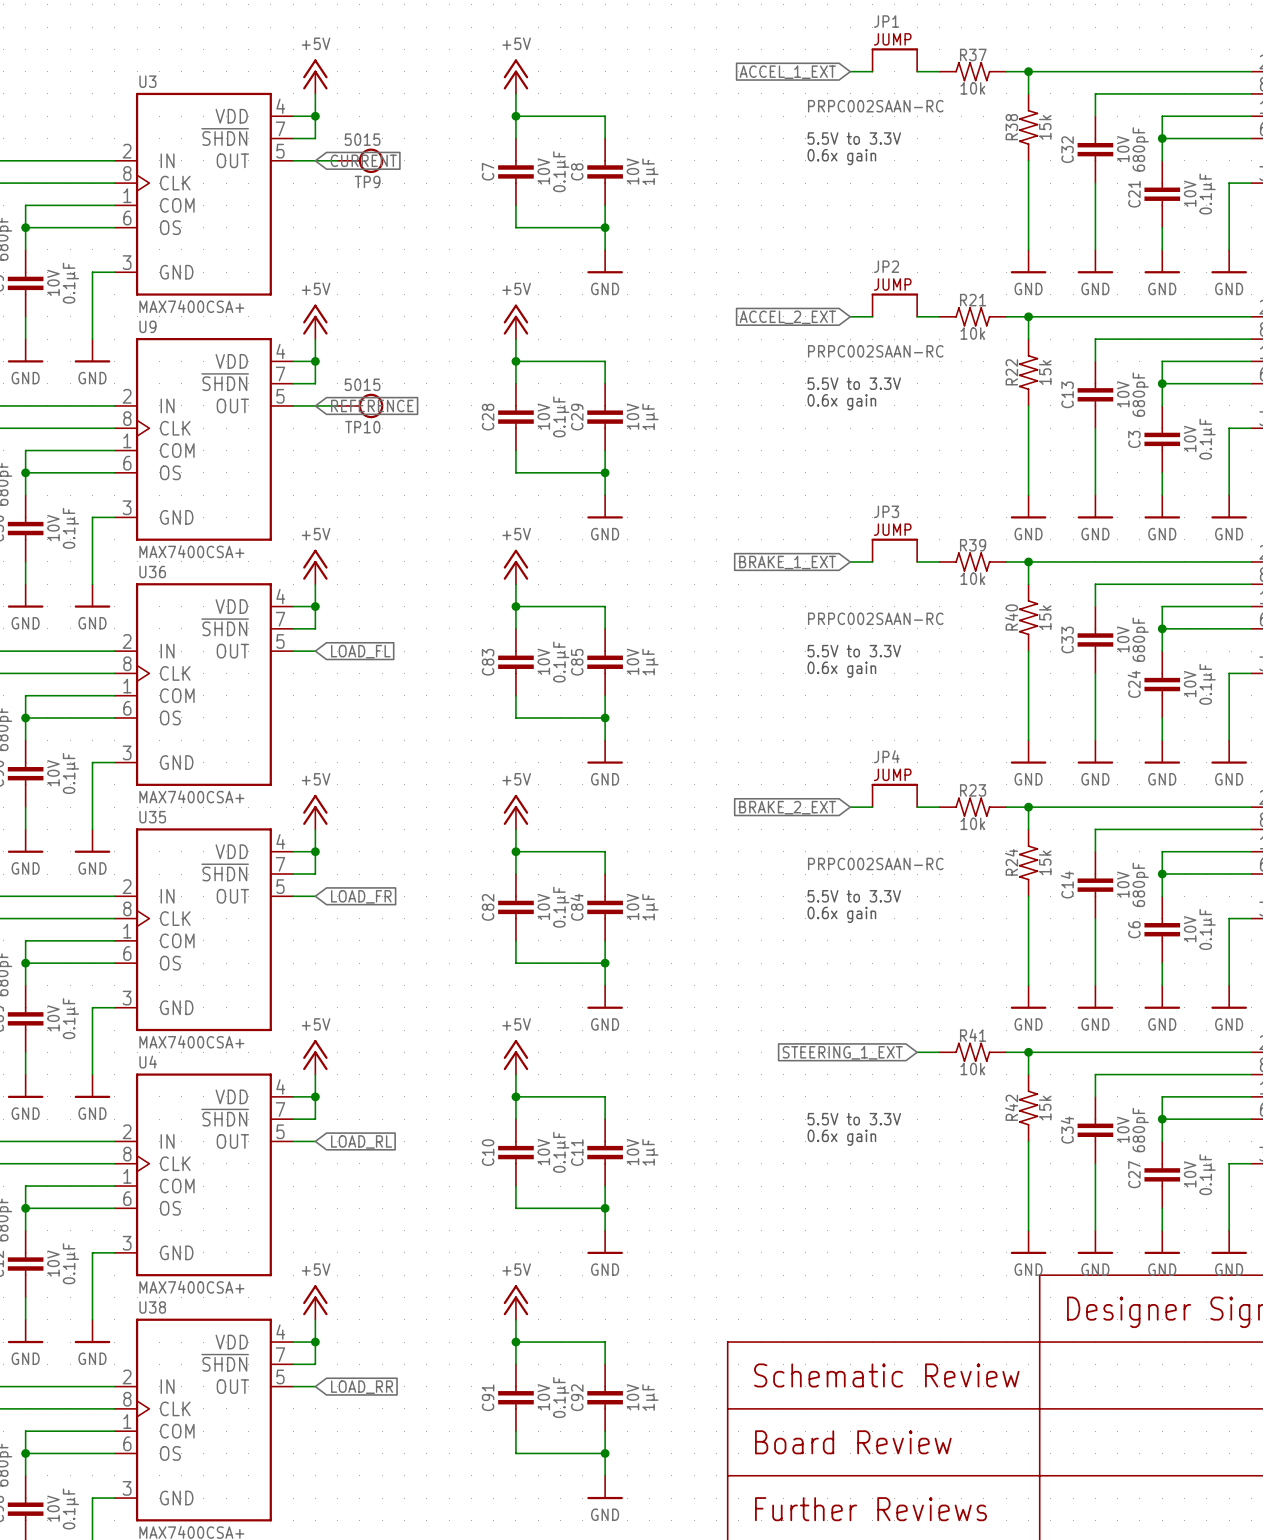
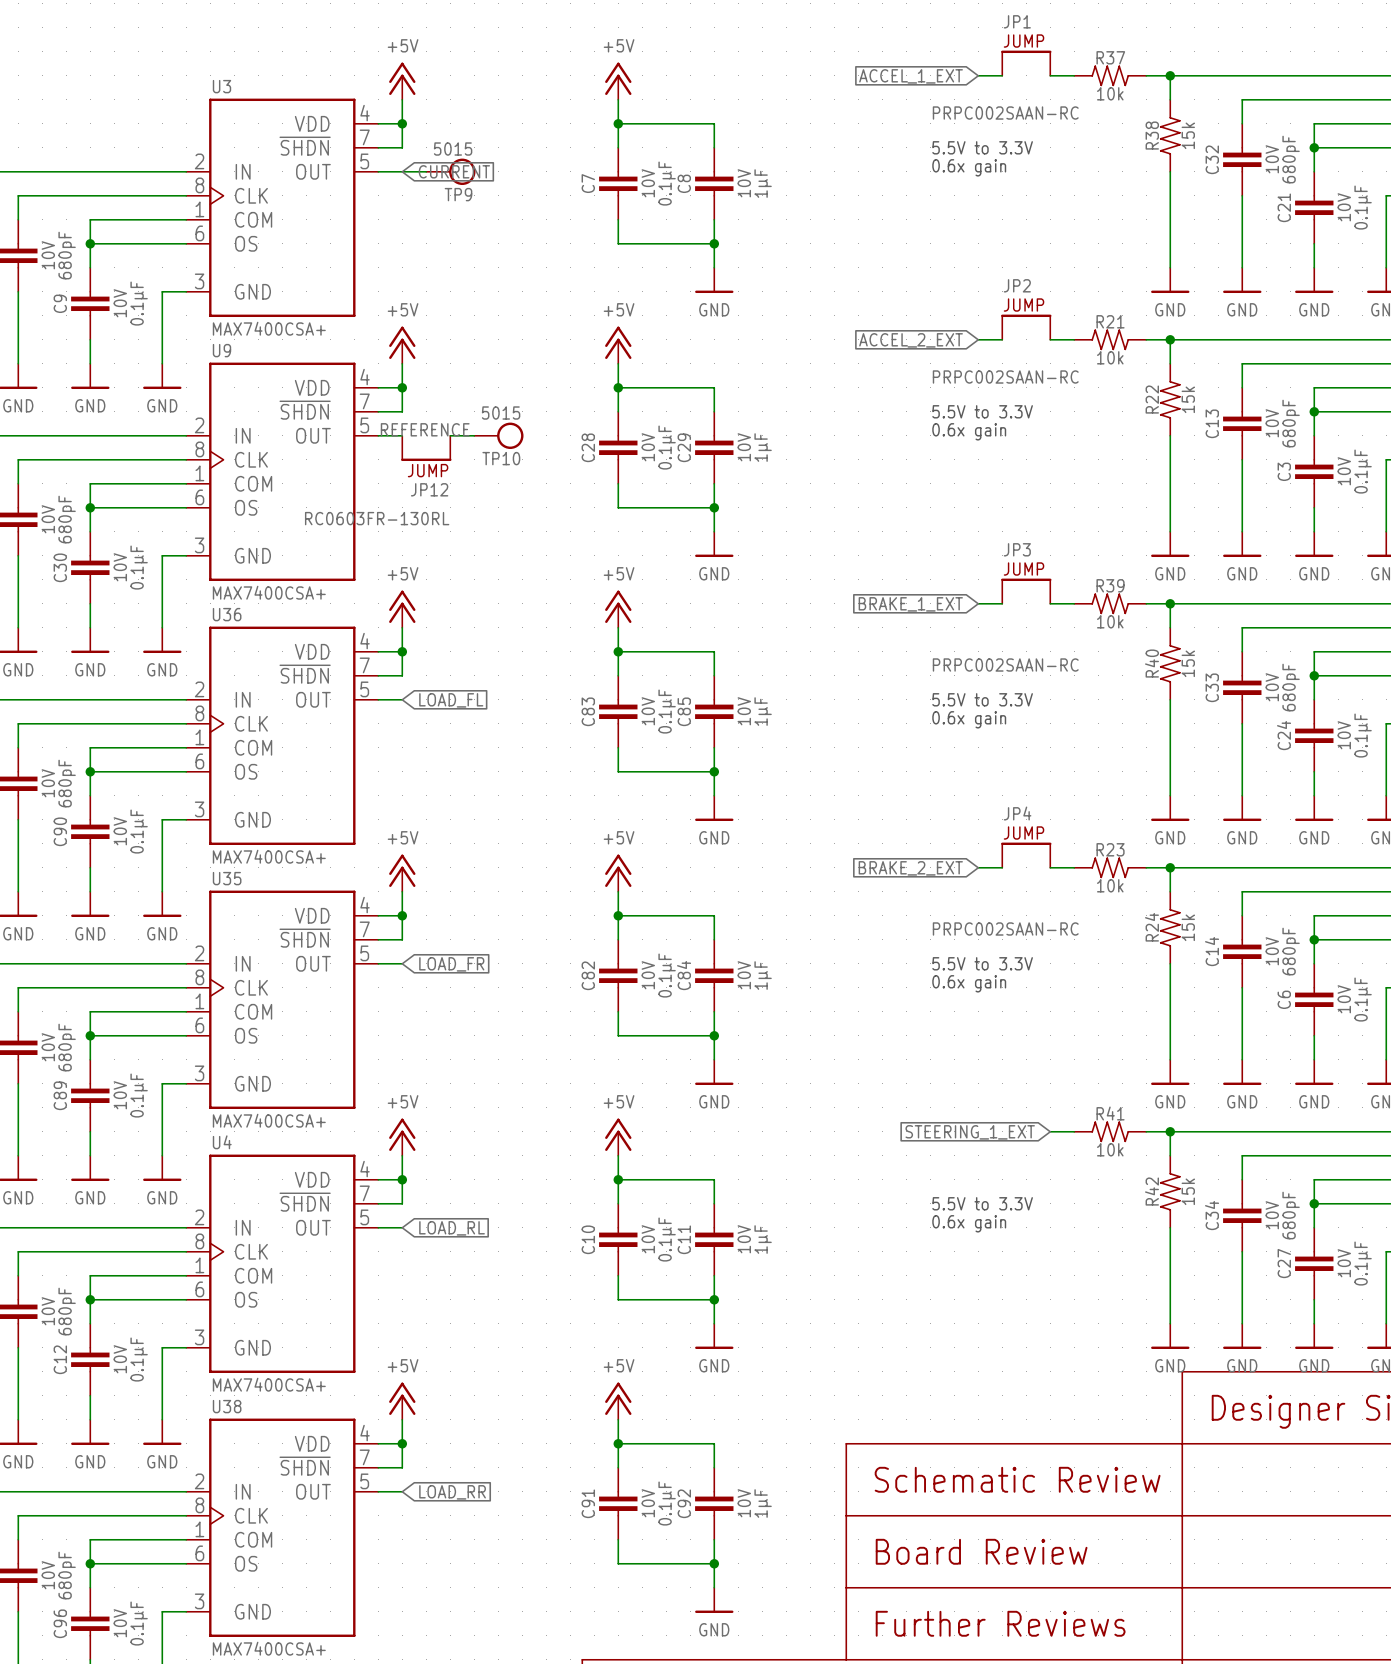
label: none -> REFERENCE (425, 429)
TP10 position: (360, 405) -> (498, 435)
global label: REFERENCE (372, 405) -> none
JP12: none -> (426, 448)

